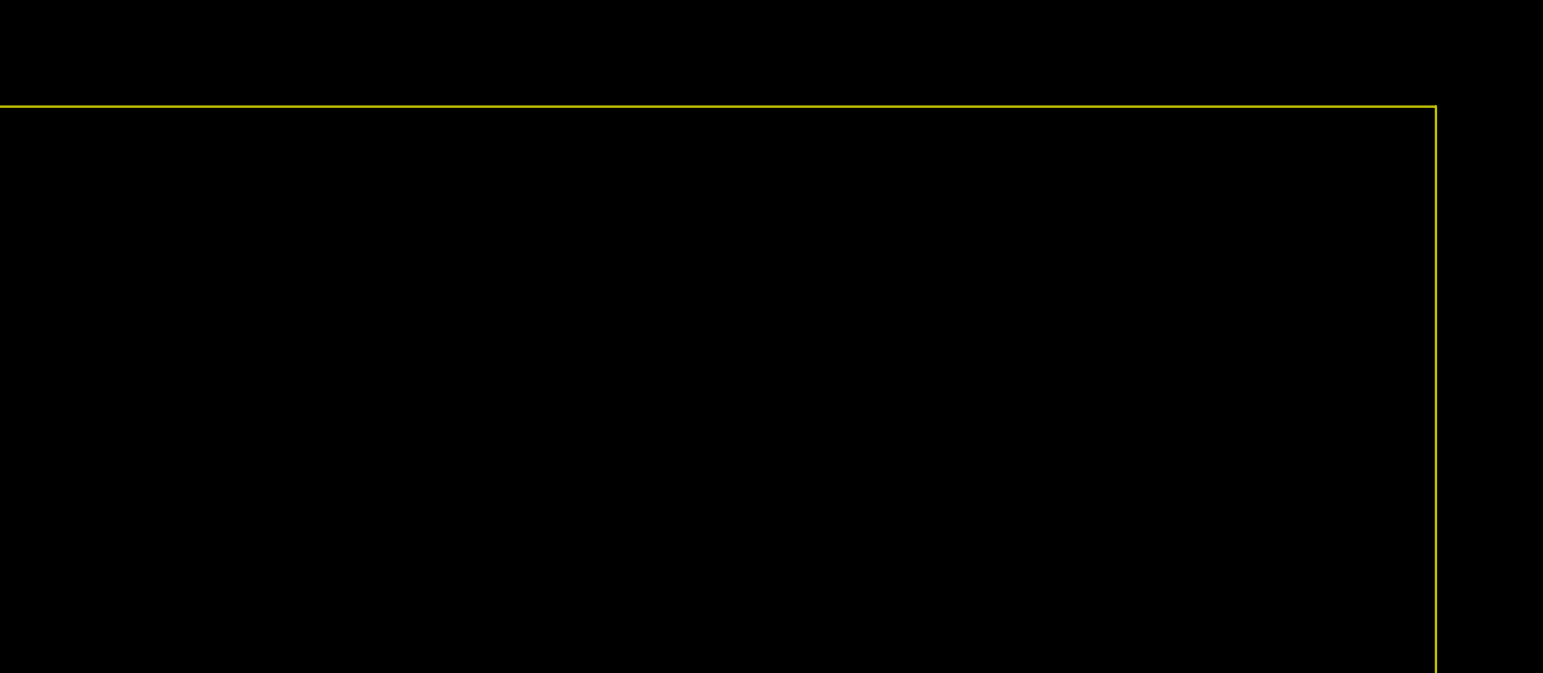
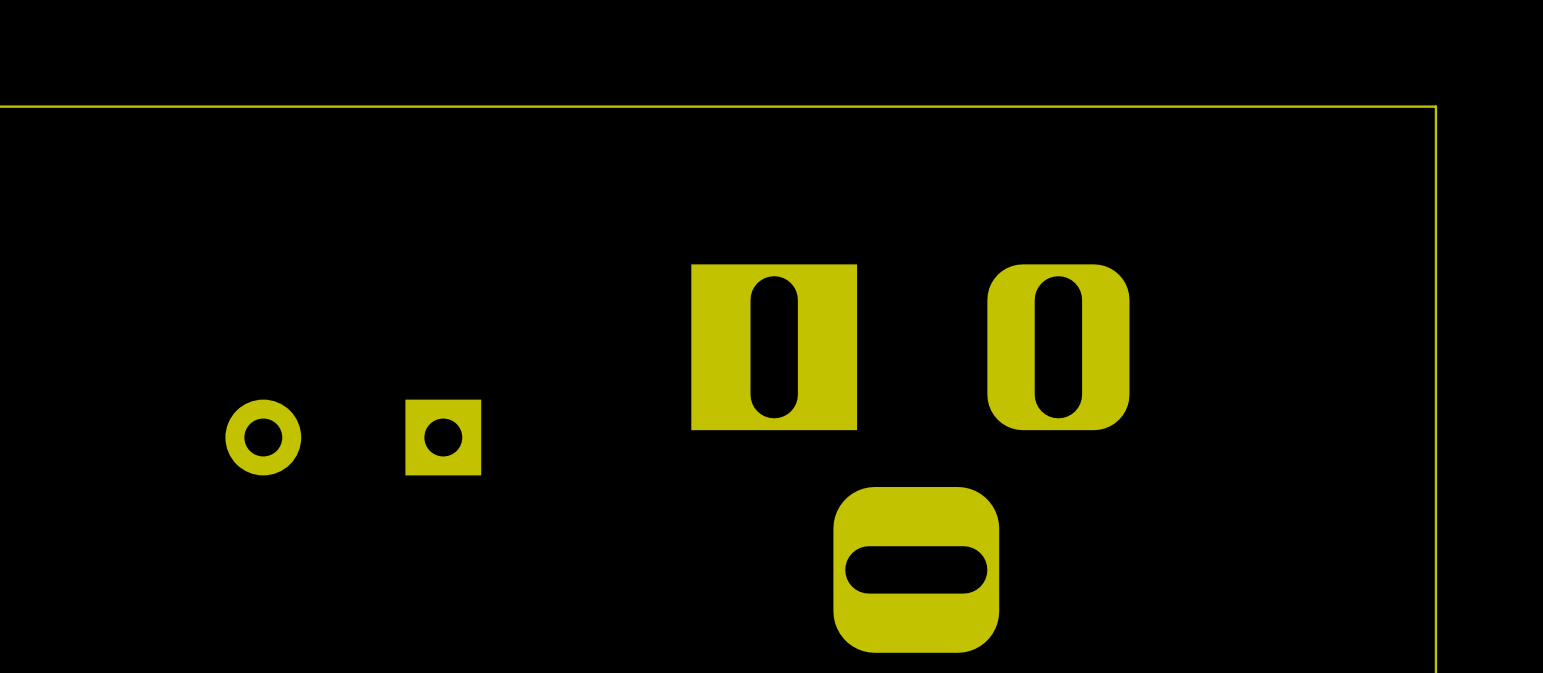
part: none -> (353, 437)
part: none -> (910, 458)

